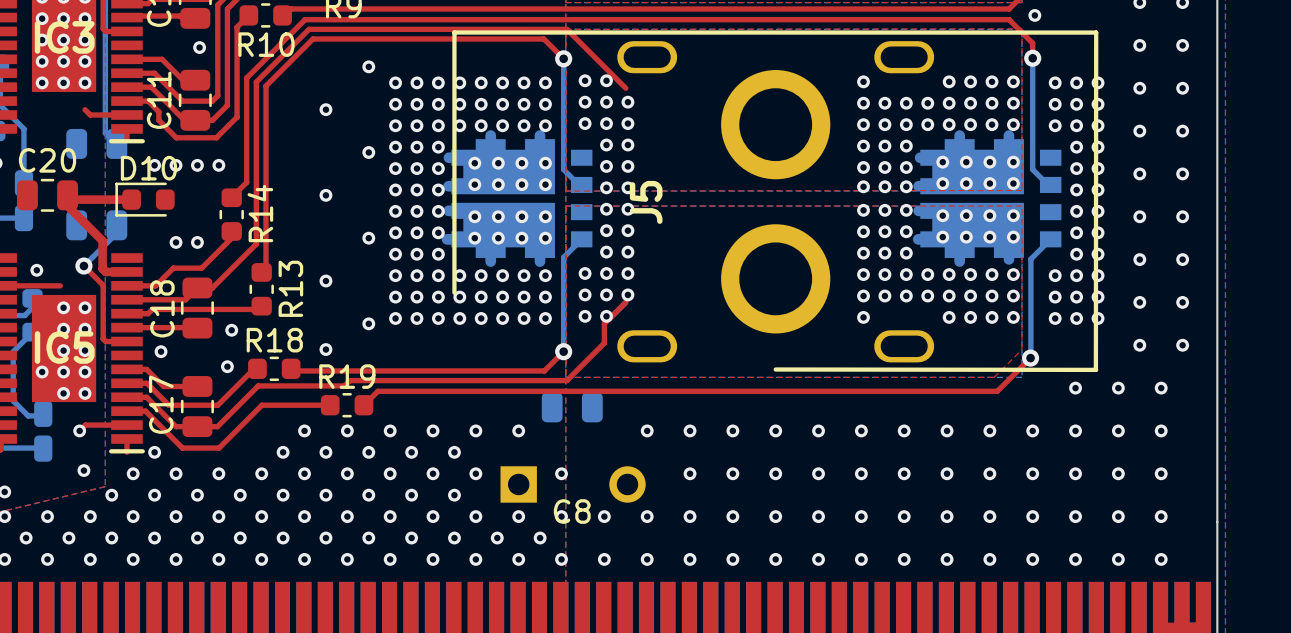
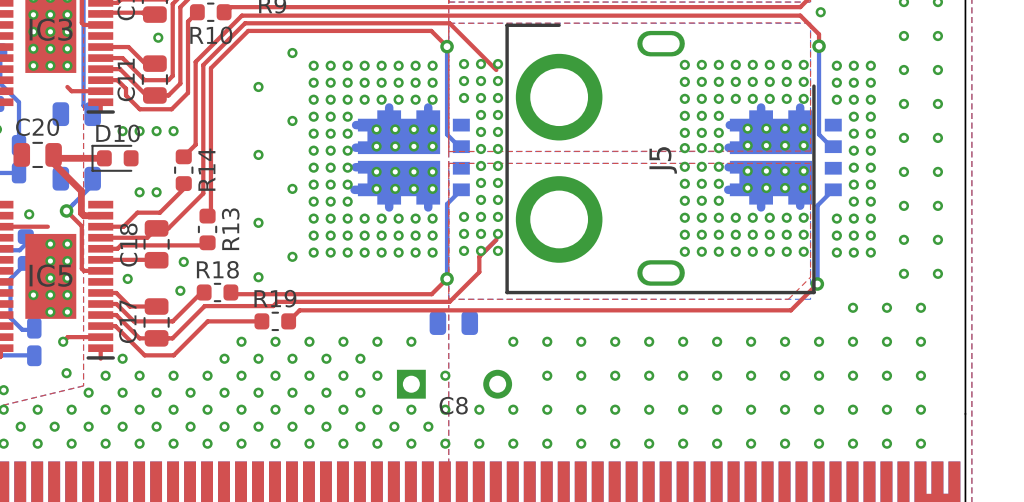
J5 footprint: [452, 30, 1099, 373] -> [505, 23, 816, 295]
via: none -> (498, 64)
via: none -> (701, 64)
via: none -> (718, 64)
via: none -> (735, 64)
J5 name position: J5 (646, 202) -> J5 (663, 160)
via: none -> (498, 250)
via: none -> (701, 251)
via: none -> (718, 251)
via: none -> (735, 251)

